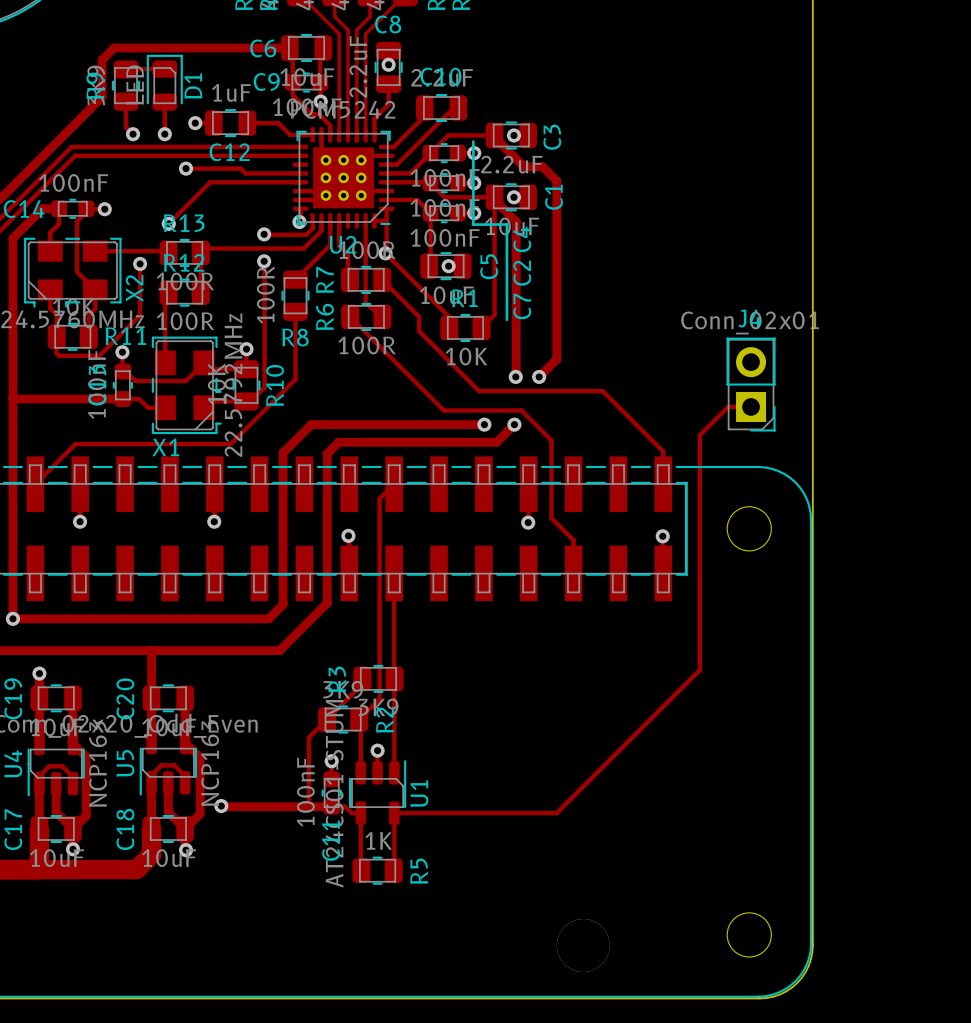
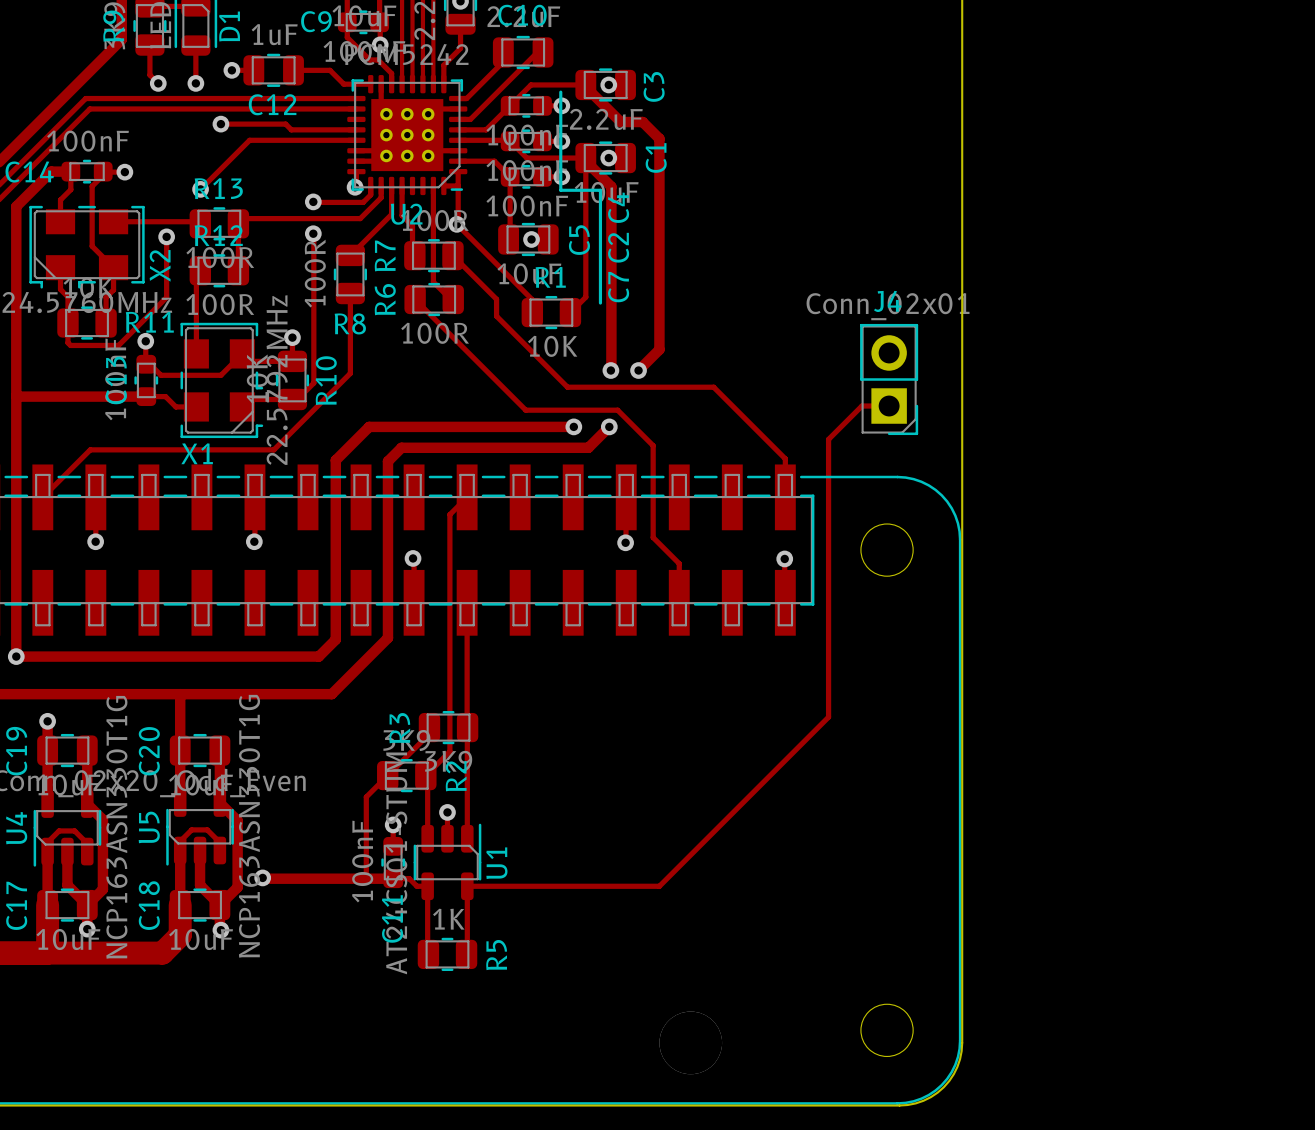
U5 value: NCP163 (210, 763) -> NCP163ASN330T1G (249, 826)
U4 value: NCP163 (98, 764) -> NCP163ASN330T1G (116, 827)

